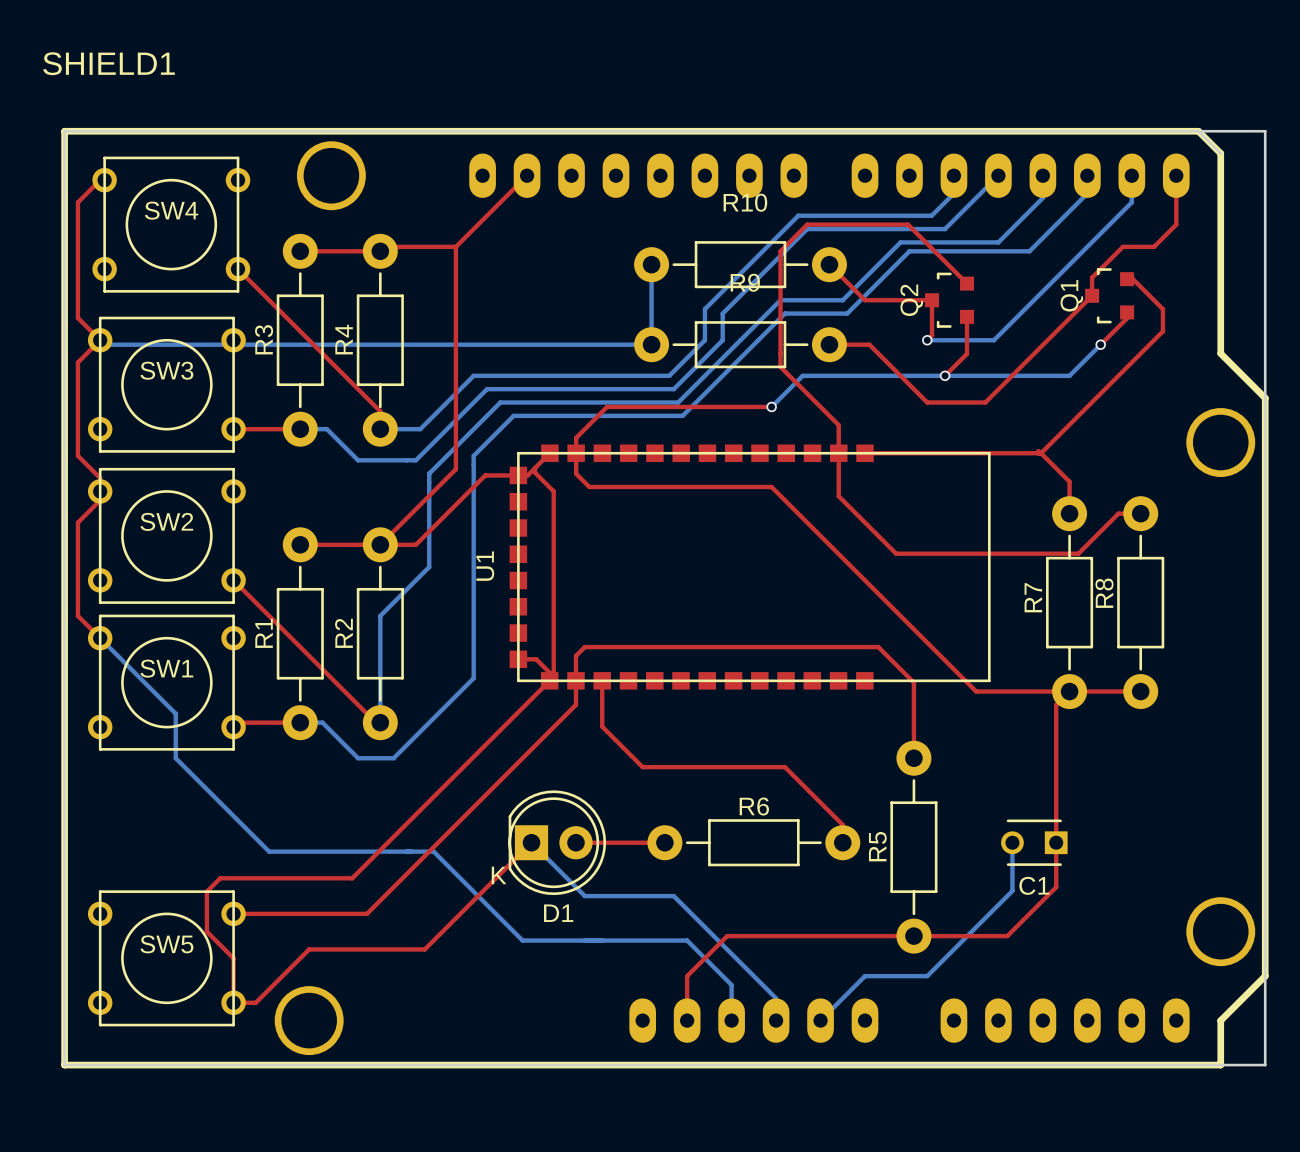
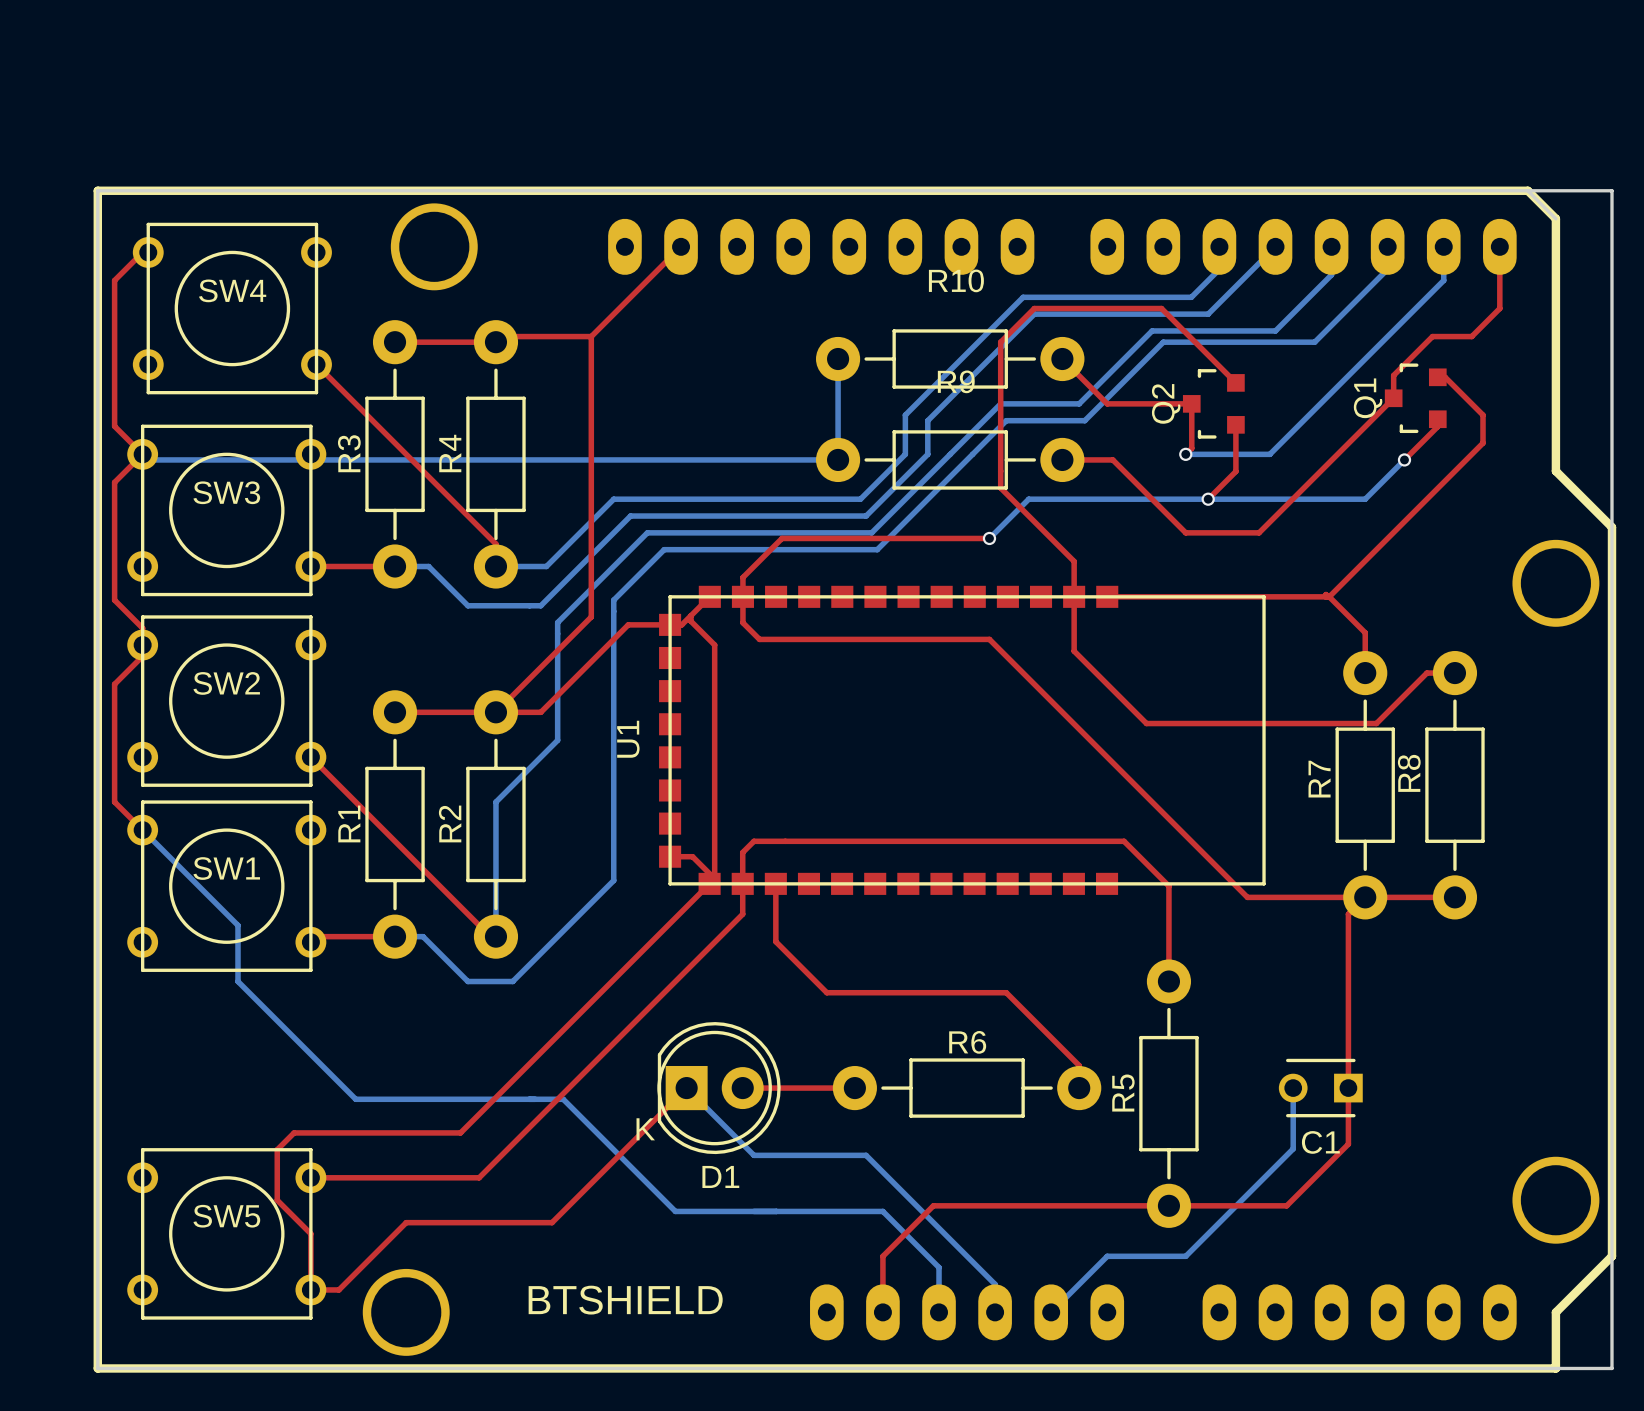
SHIELD1 name: SHIELD1 (109, 63) -> BTSHIELD (625, 1300)

